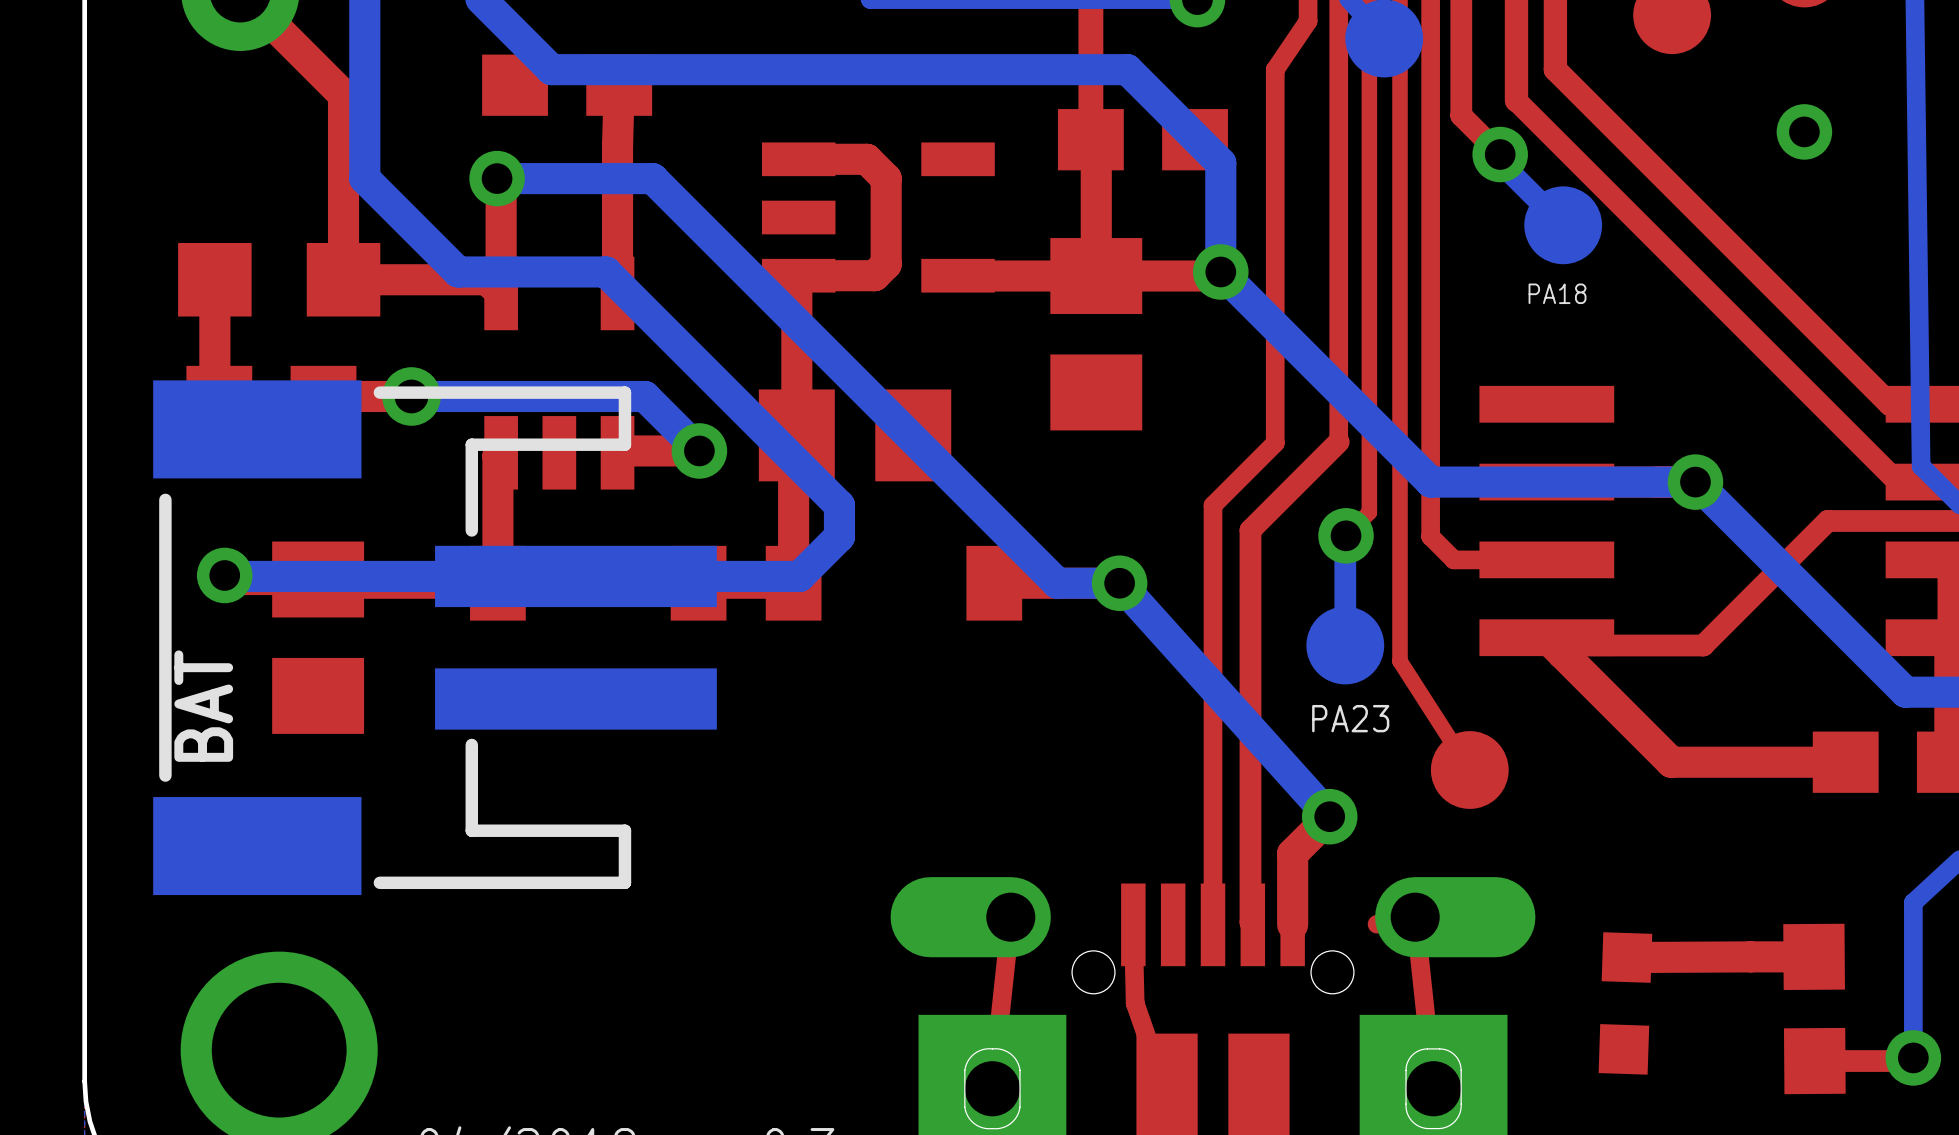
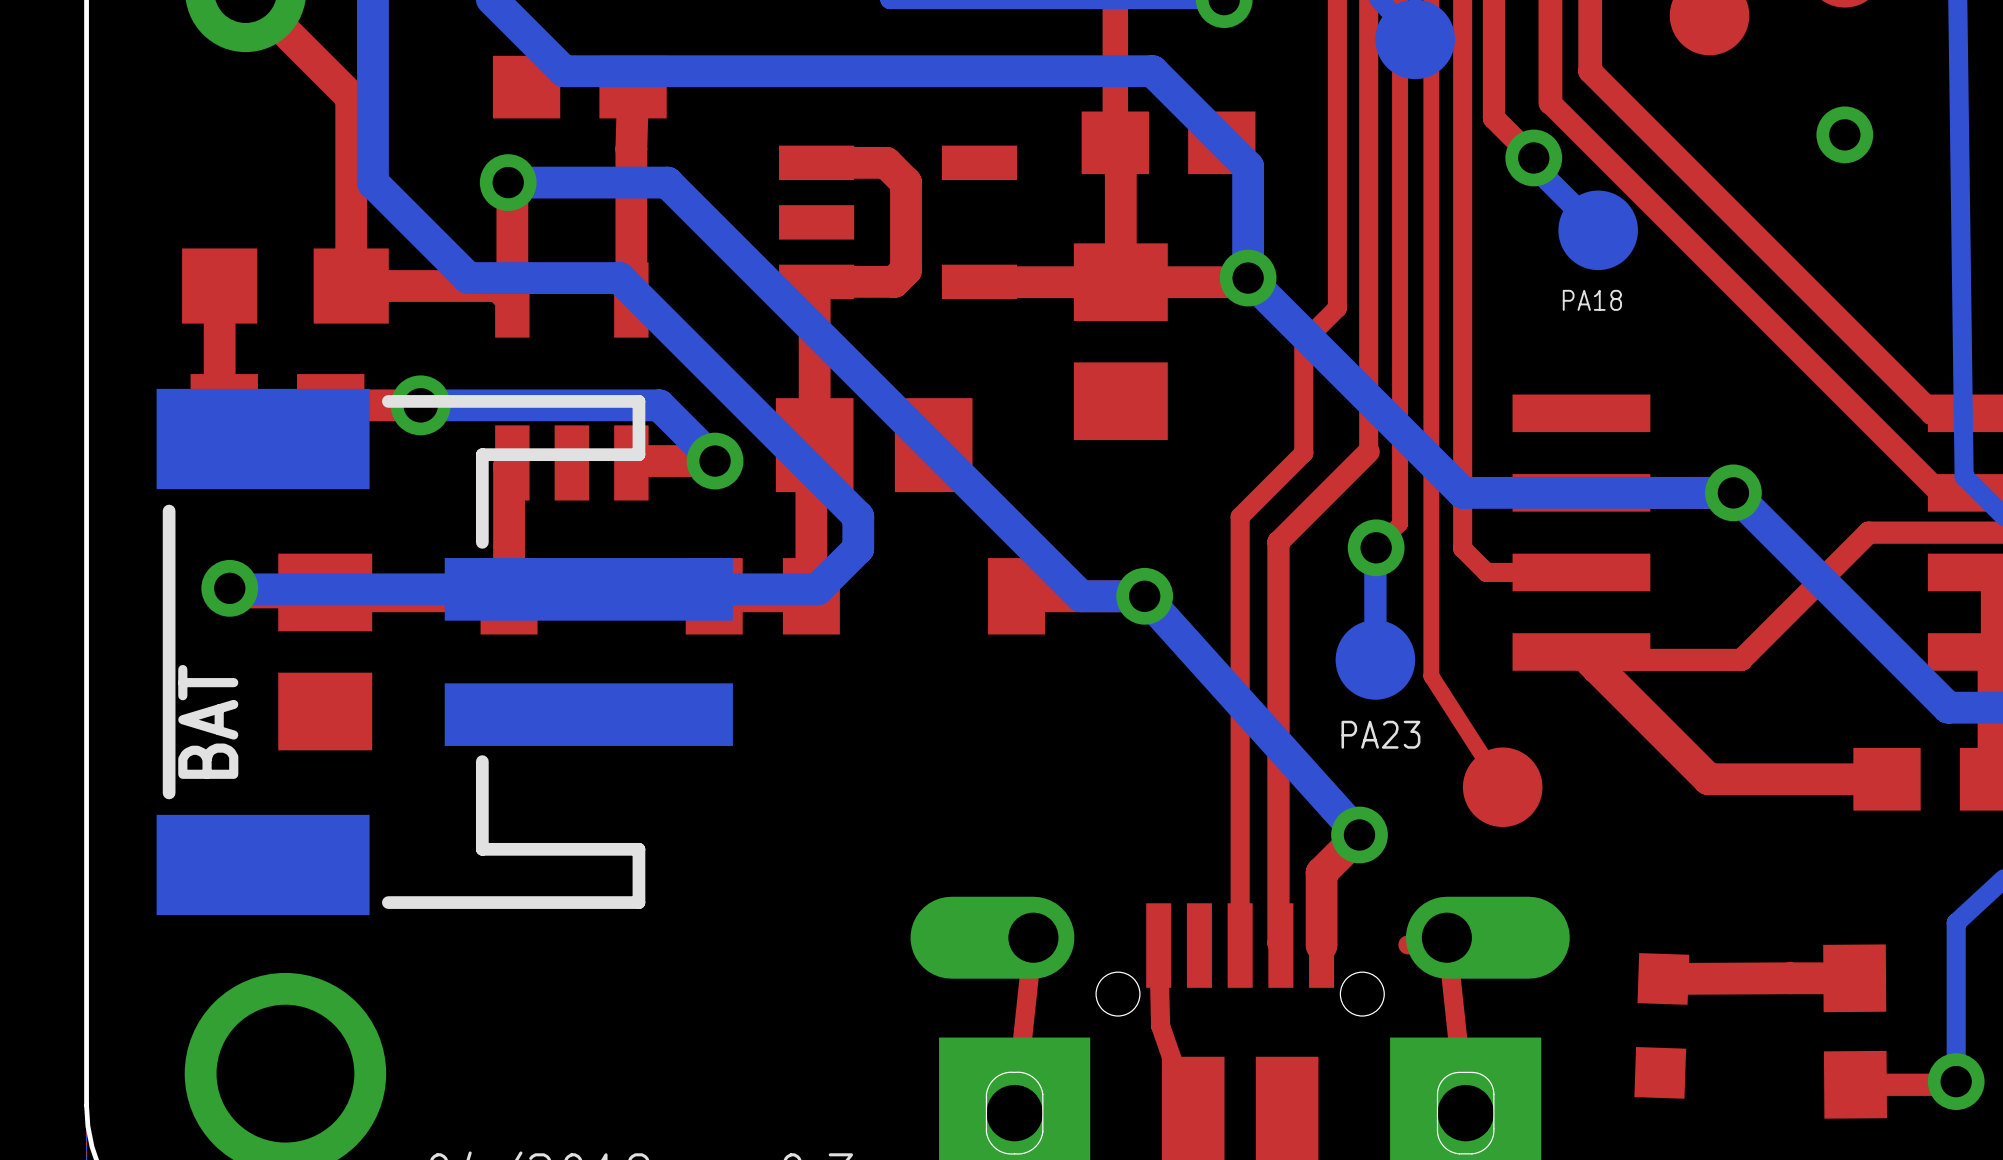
top track: (1308, 21) (1275, 69) (1275, 334) -> (1337, 21) (1337, 308) (1303, 341)

